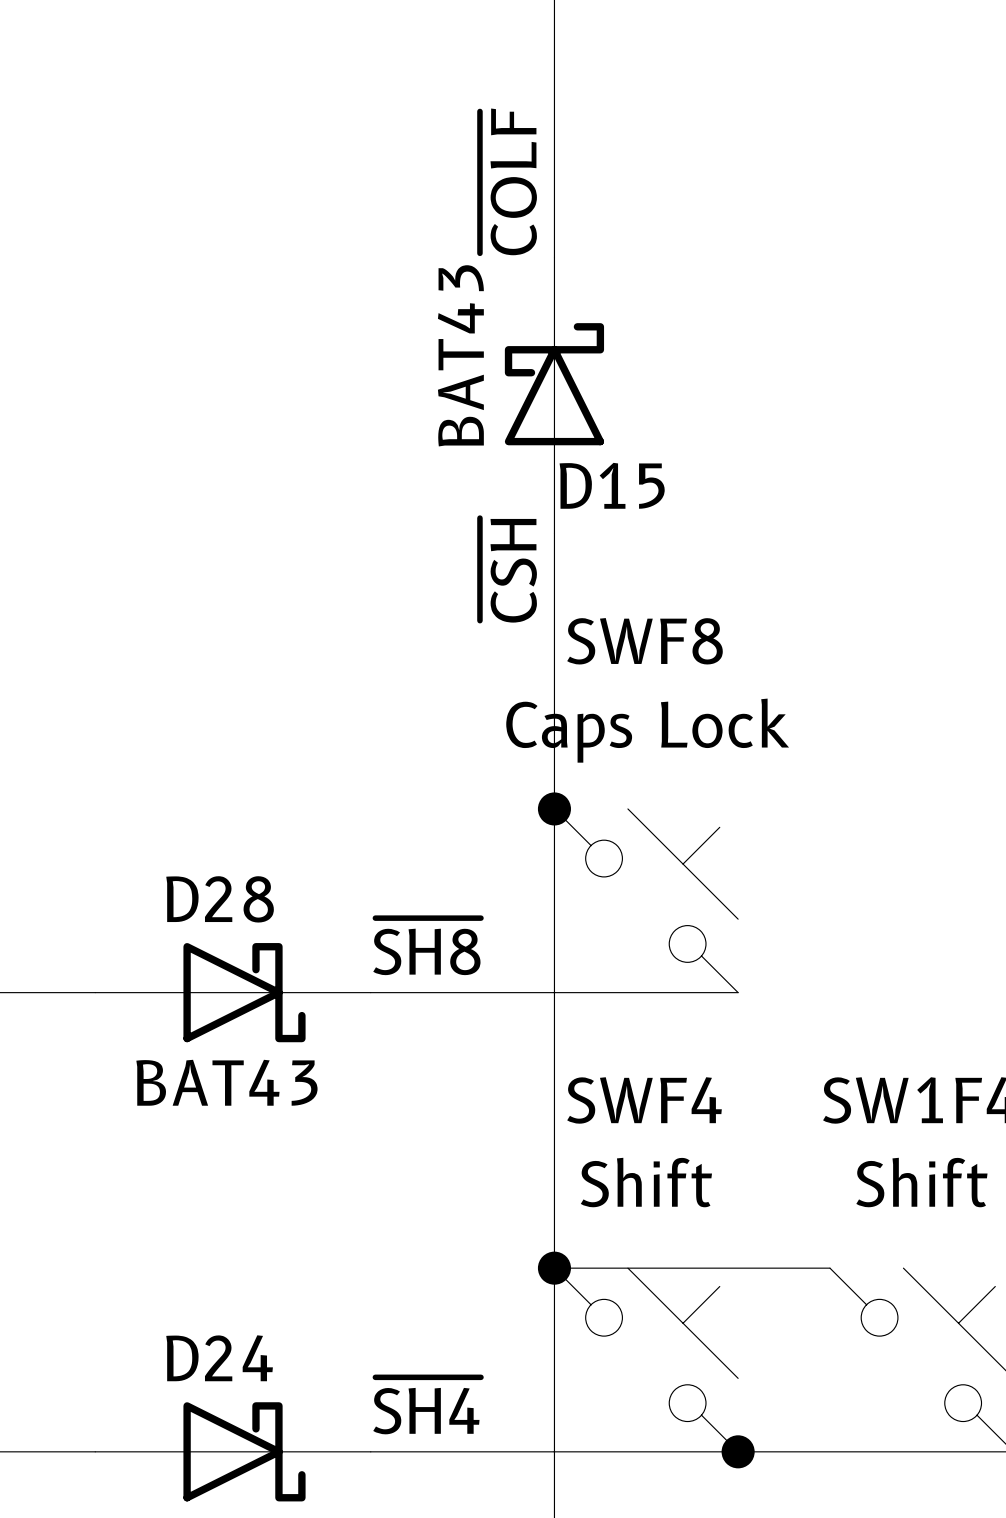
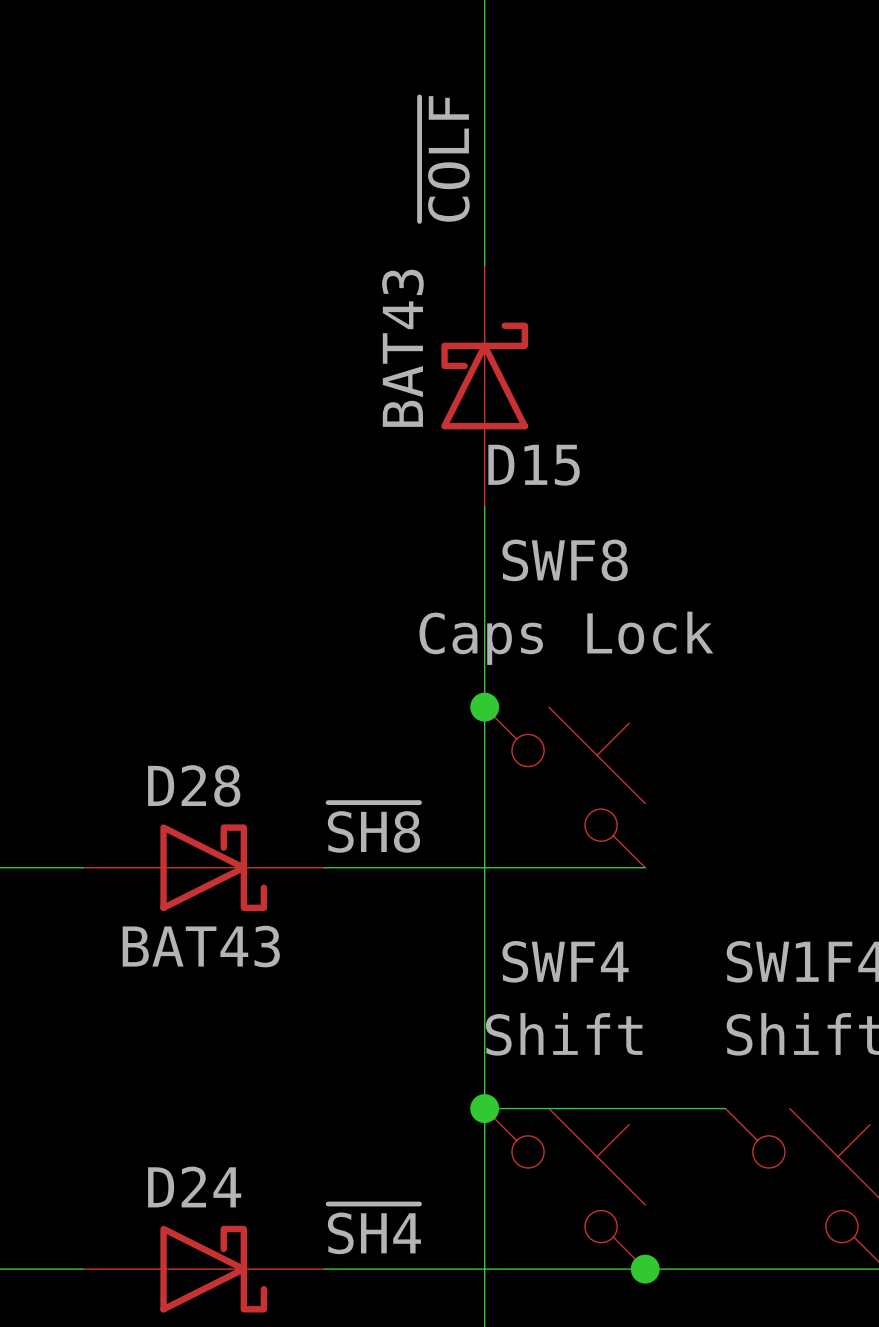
D15 position: (554, 395) -> (484, 386)
label: ~{CSH} (508, 570) -> none

